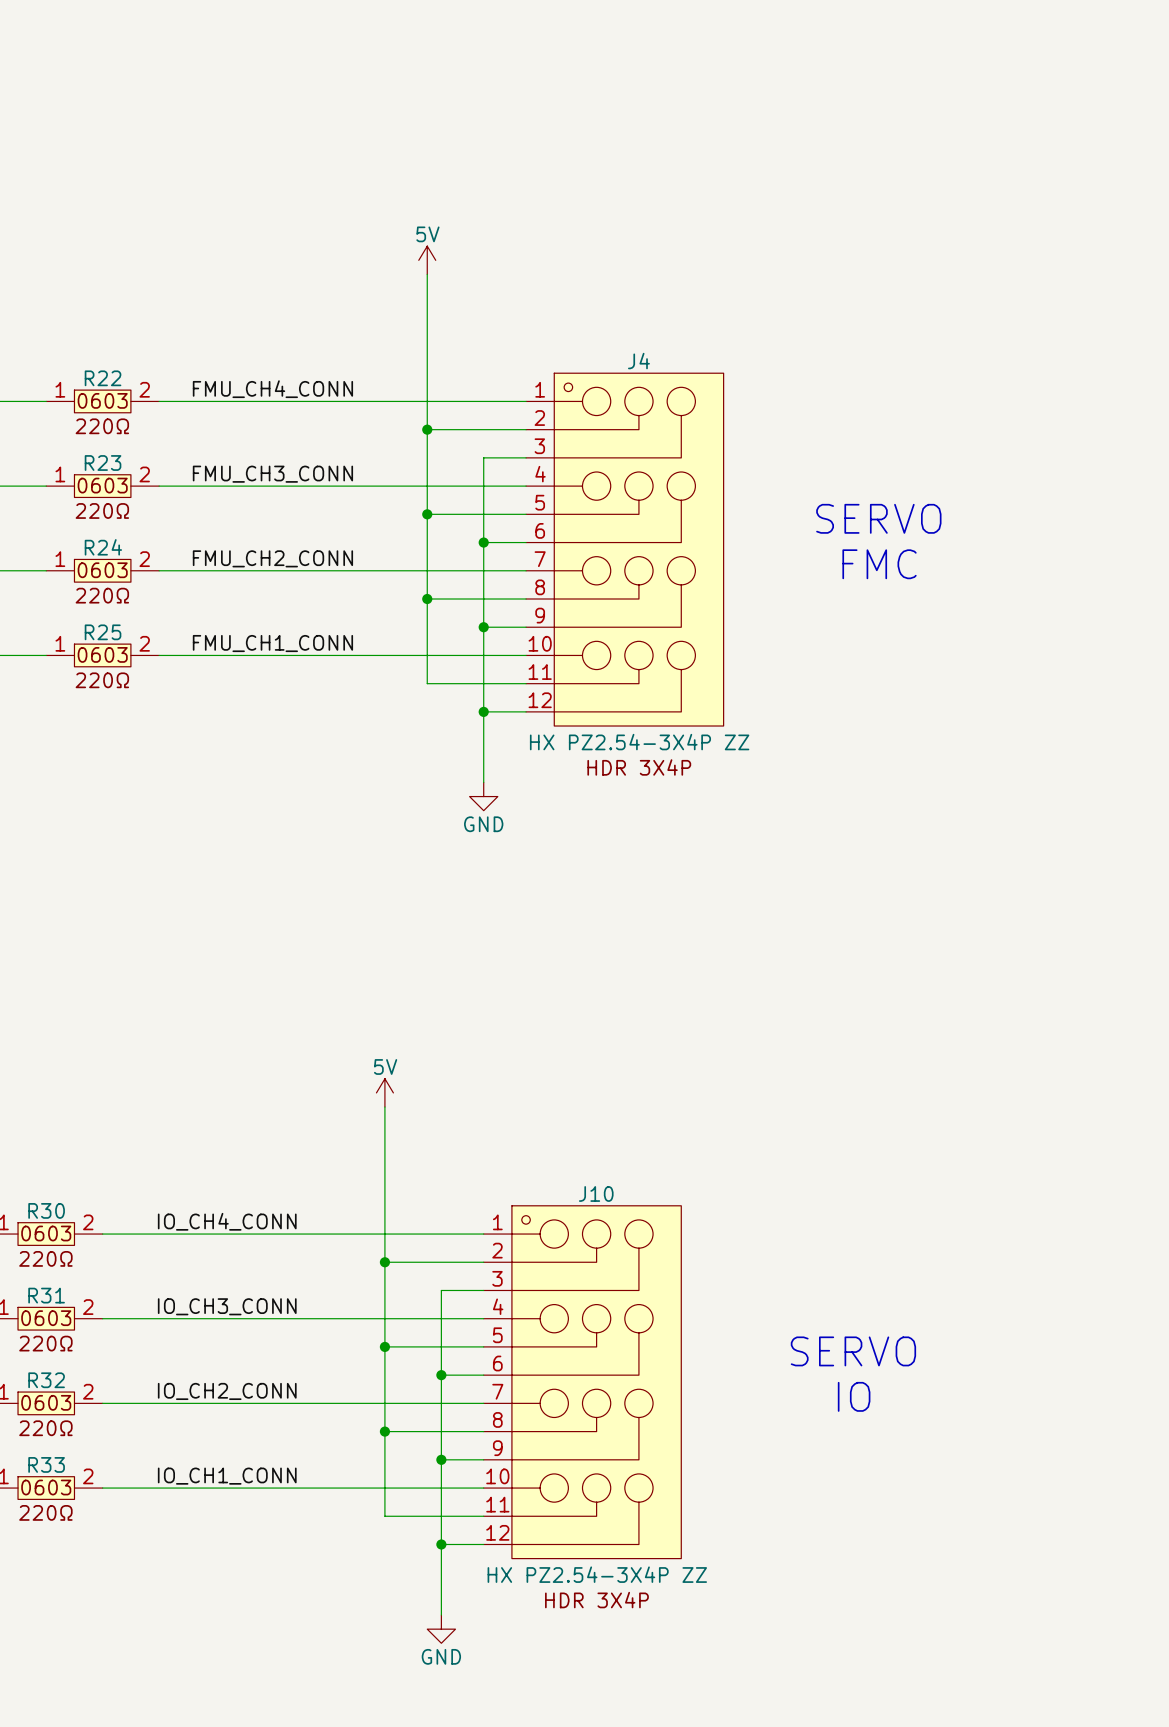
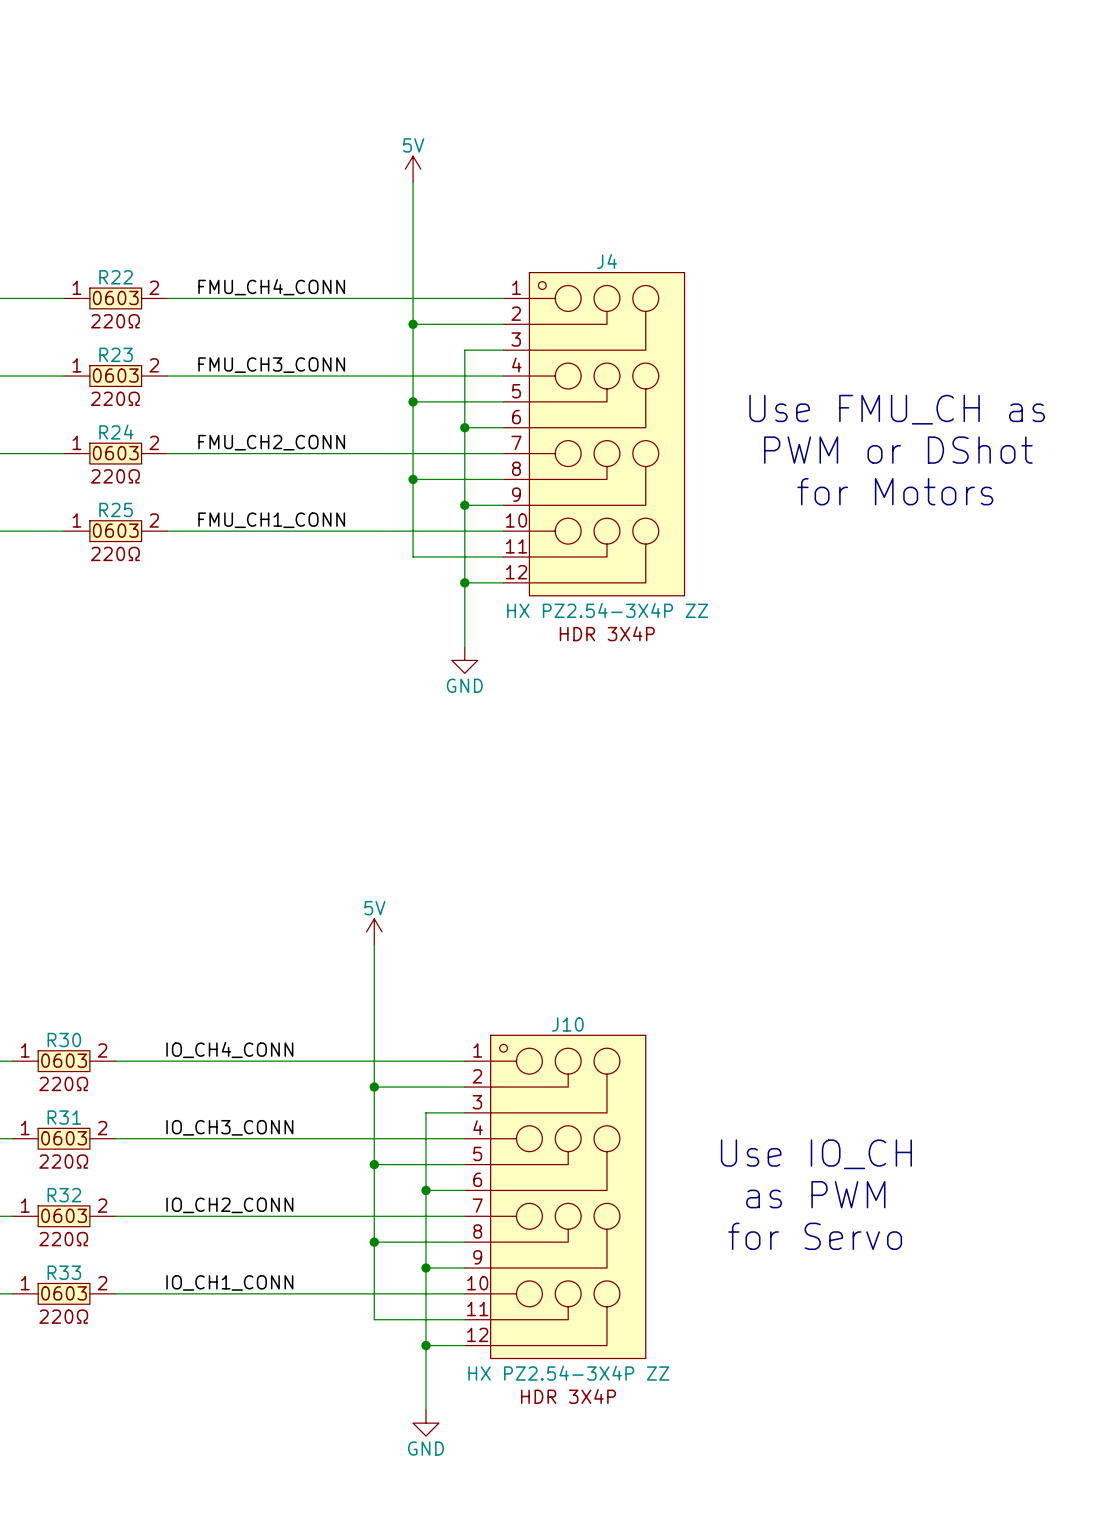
text: SERVO (878, 518) -> none
text: none -> Use FMU_CH as (897, 409)
text: FMC (879, 564) -> none
text: none -> PWM or DShot (898, 450)
text: none -> for Motors (895, 491)
text: none -> Use IO_CH (816, 1154)
text: SERVO (853, 1351) -> none
text: none -> as PWM (815, 1194)
text: IO (854, 1396) -> none
text: none -> for Servo (815, 1236)

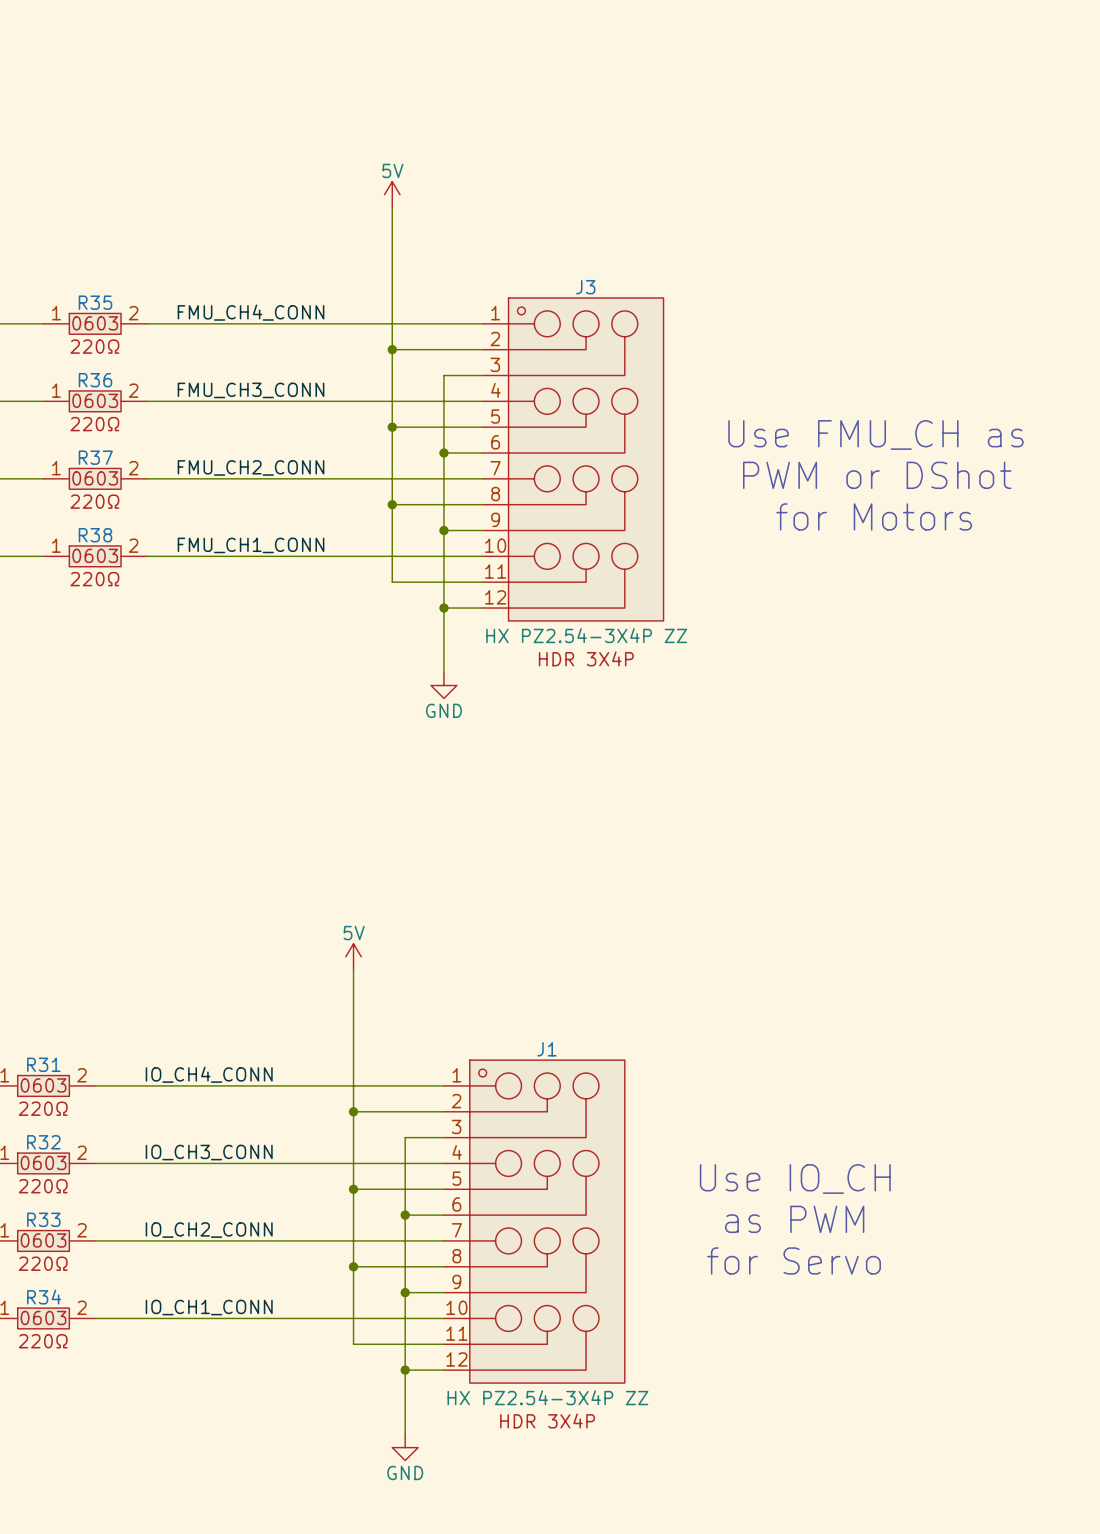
J4 name: J4 (606, 261) -> J3 (585, 287)
R22 name: R22 (116, 277) -> R35 (95, 302)
R23 name: R23 (116, 354) -> R36 (95, 380)
R24 name: R24 (116, 432) -> R37 (95, 457)
R25 name: R25 (116, 509) -> R38 (95, 535)
J10 name: J10 (567, 1024) -> J1 (546, 1049)
R30 name: R30 (64, 1040) -> R31 (43, 1064)
R31 name: R31 (64, 1117) -> R32 (43, 1142)
R32 name: R32 (64, 1195) -> R33 (43, 1219)
R33 name: R33 (64, 1272) -> R34 (44, 1297)

